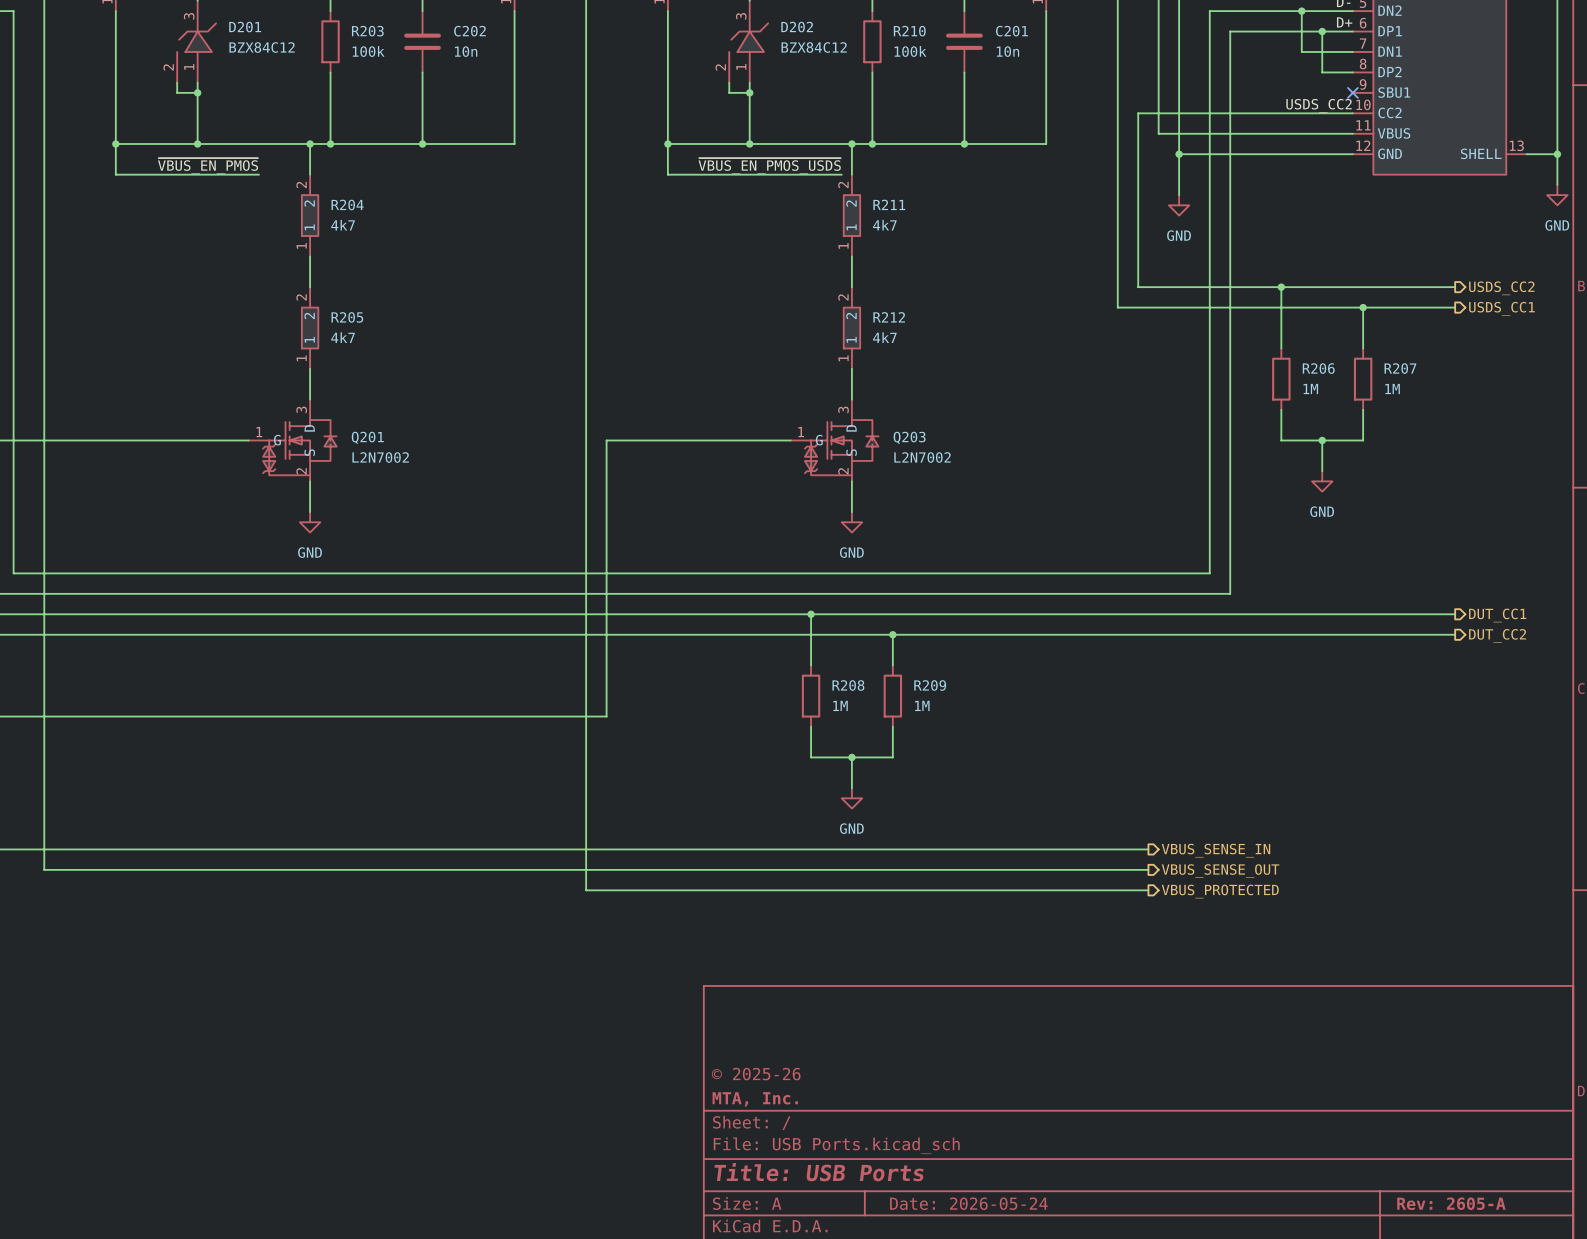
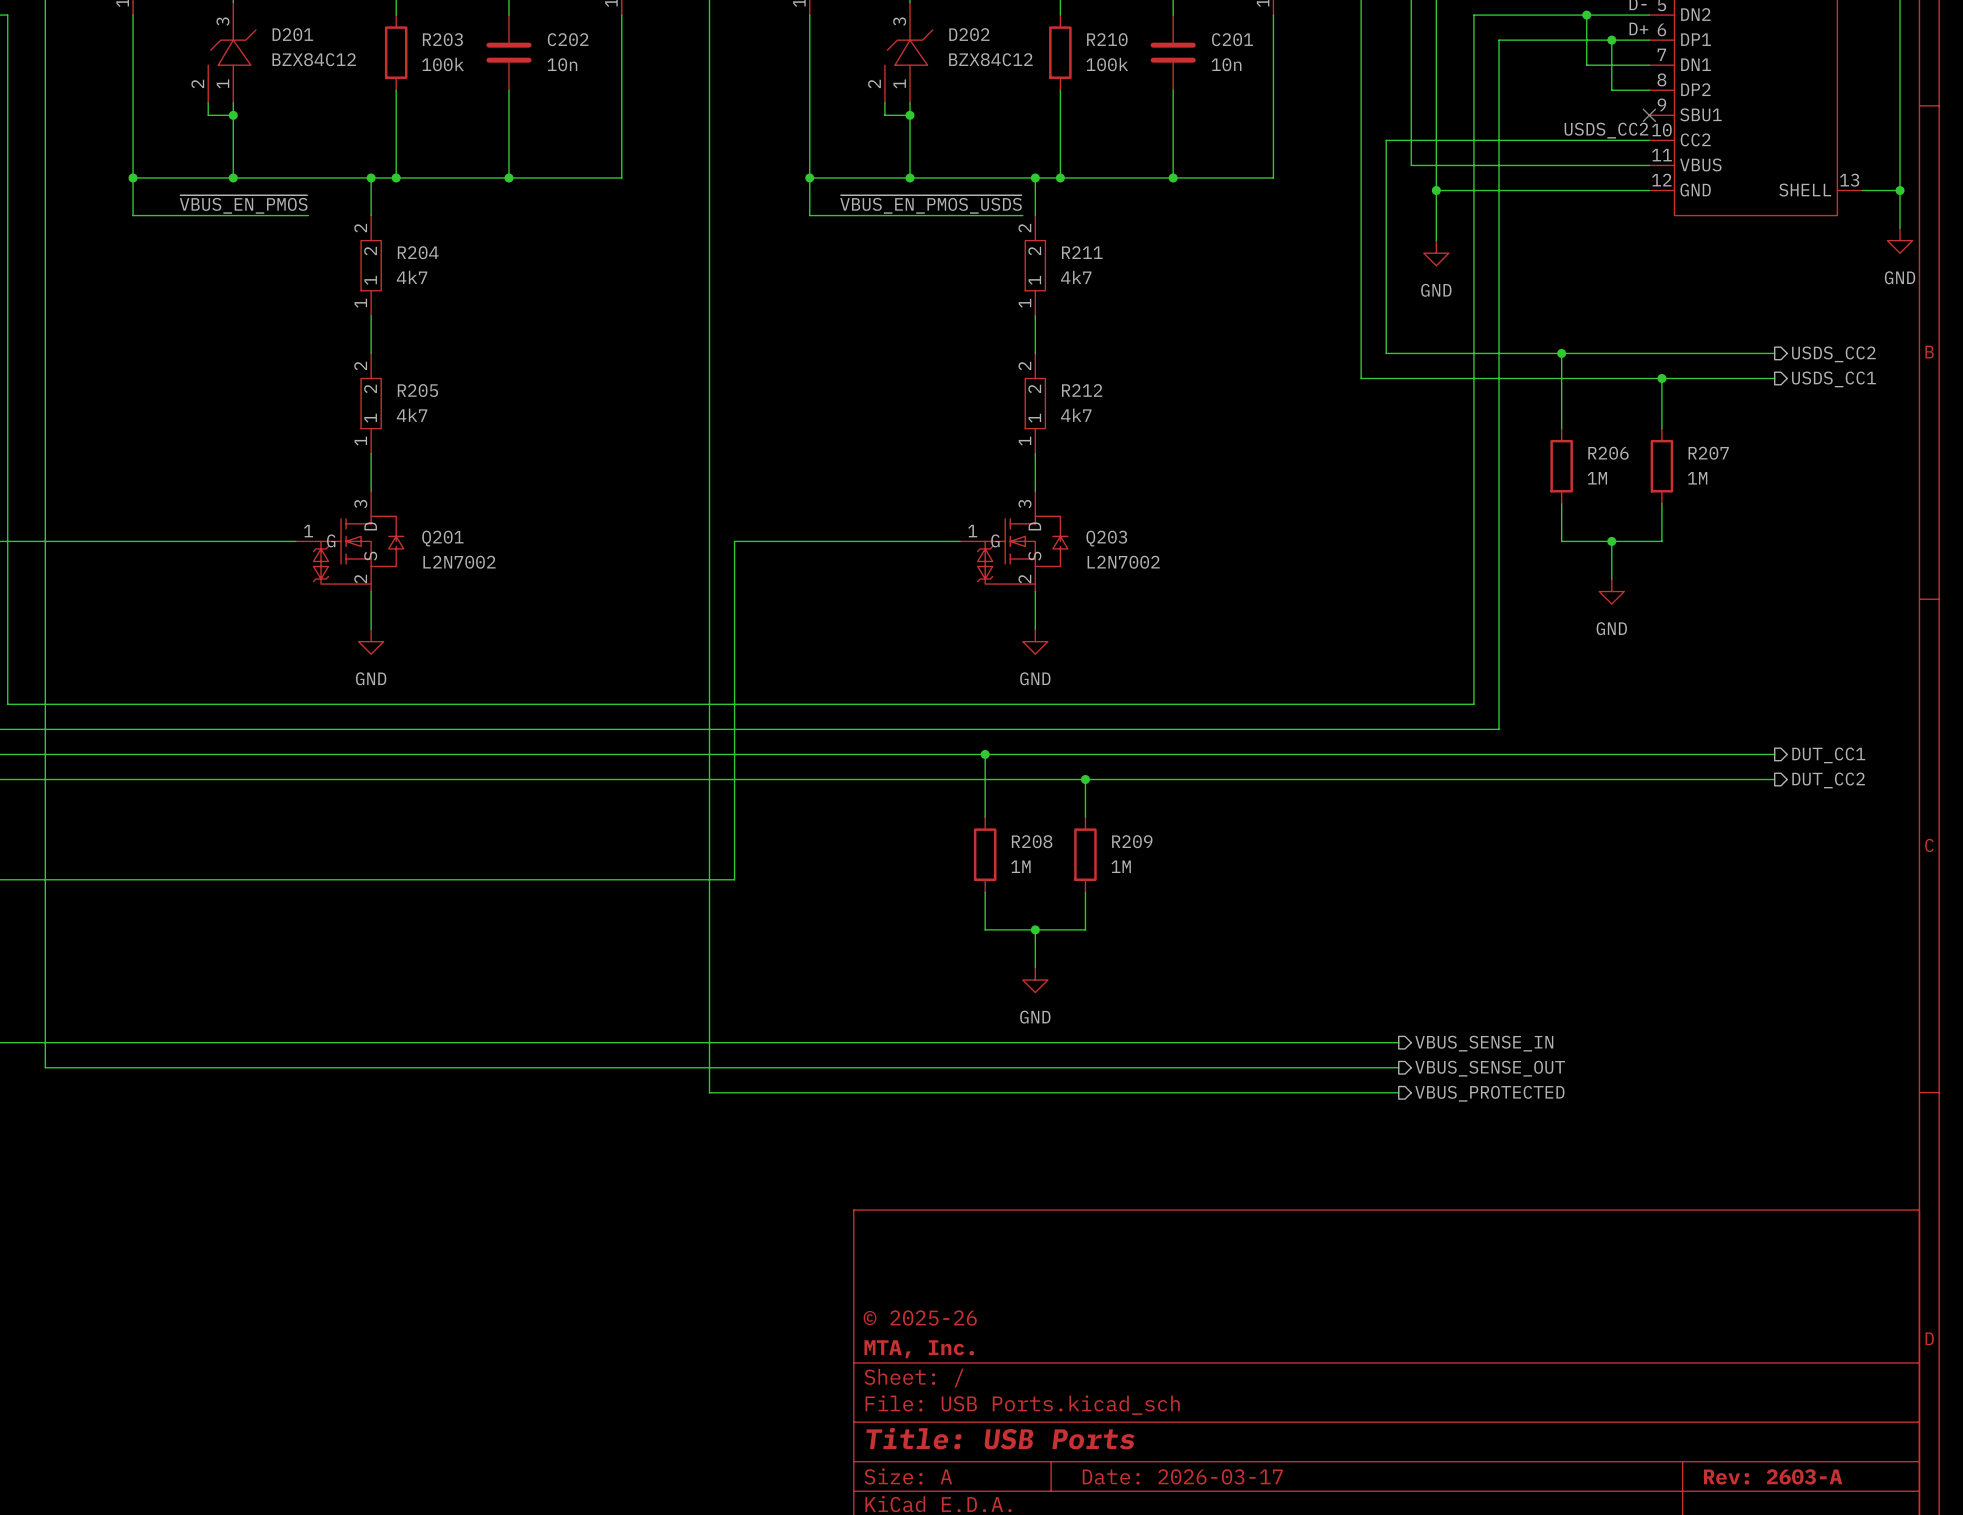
title block: Date: 2026-05-24 (968, 1203) -> Date: 2026-03-17 (1182, 1476)
title block: Rev: 2605-A (1451, 1203) -> Rev: 2603-A (1773, 1476)

